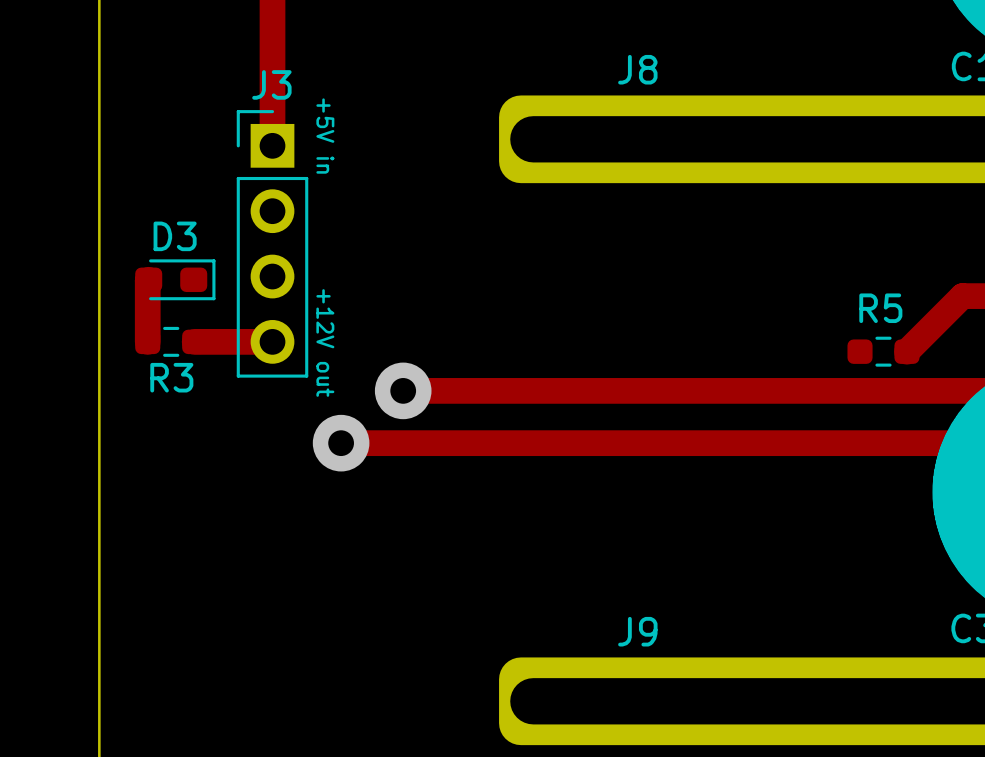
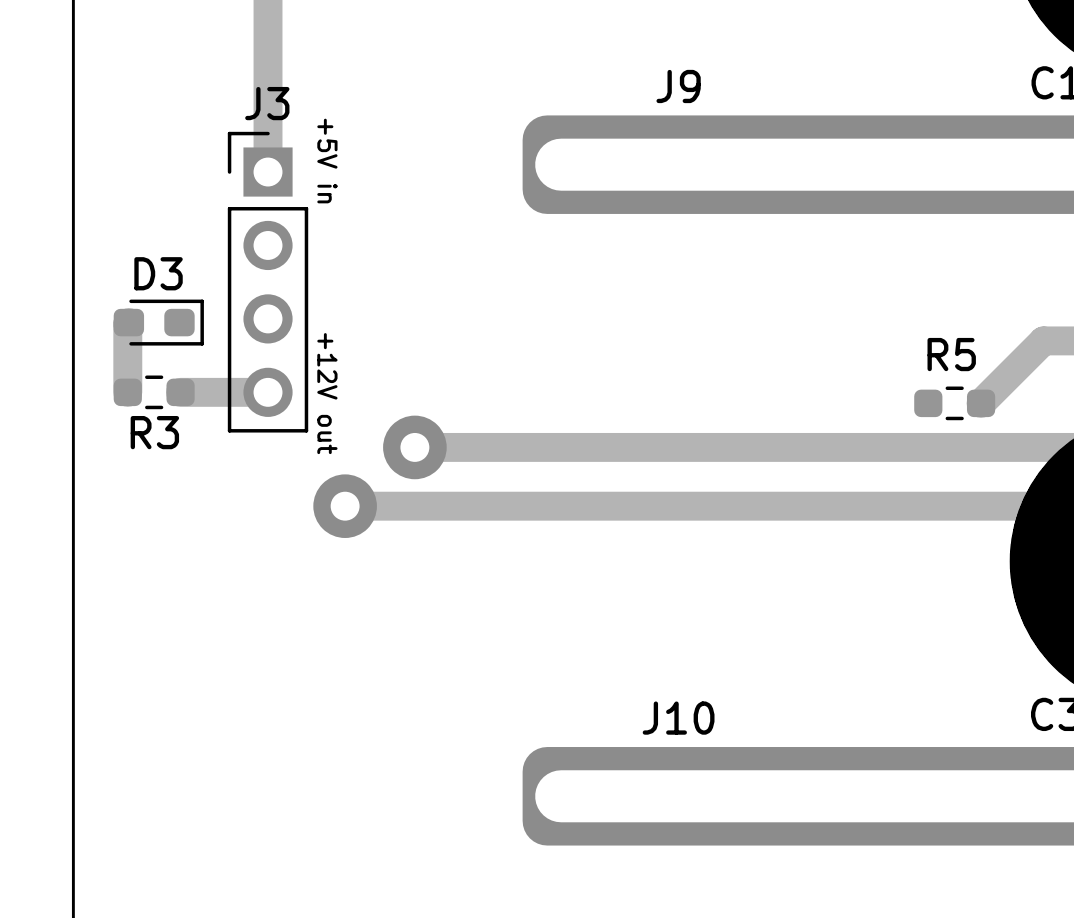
J8 name: J8 (637, 69) -> J9 (678, 86)
J9 name: J9 (637, 631) -> J10 (678, 718)

